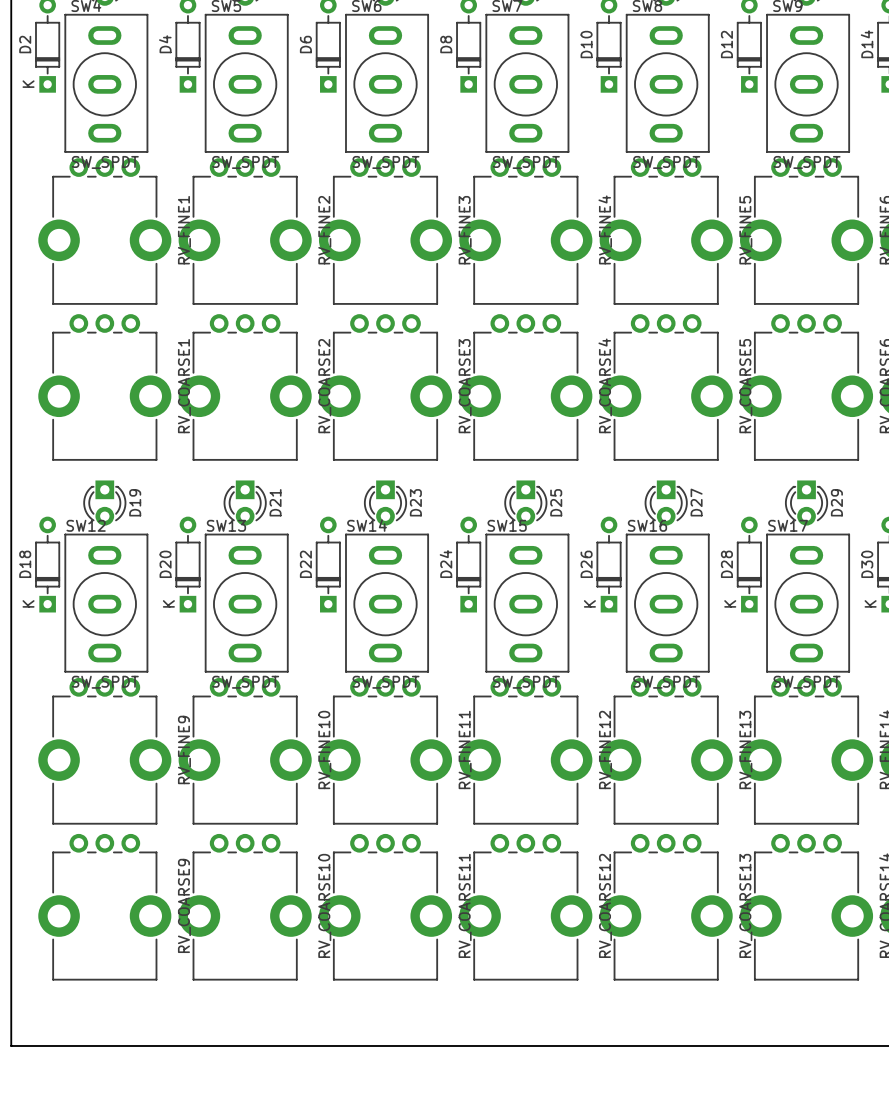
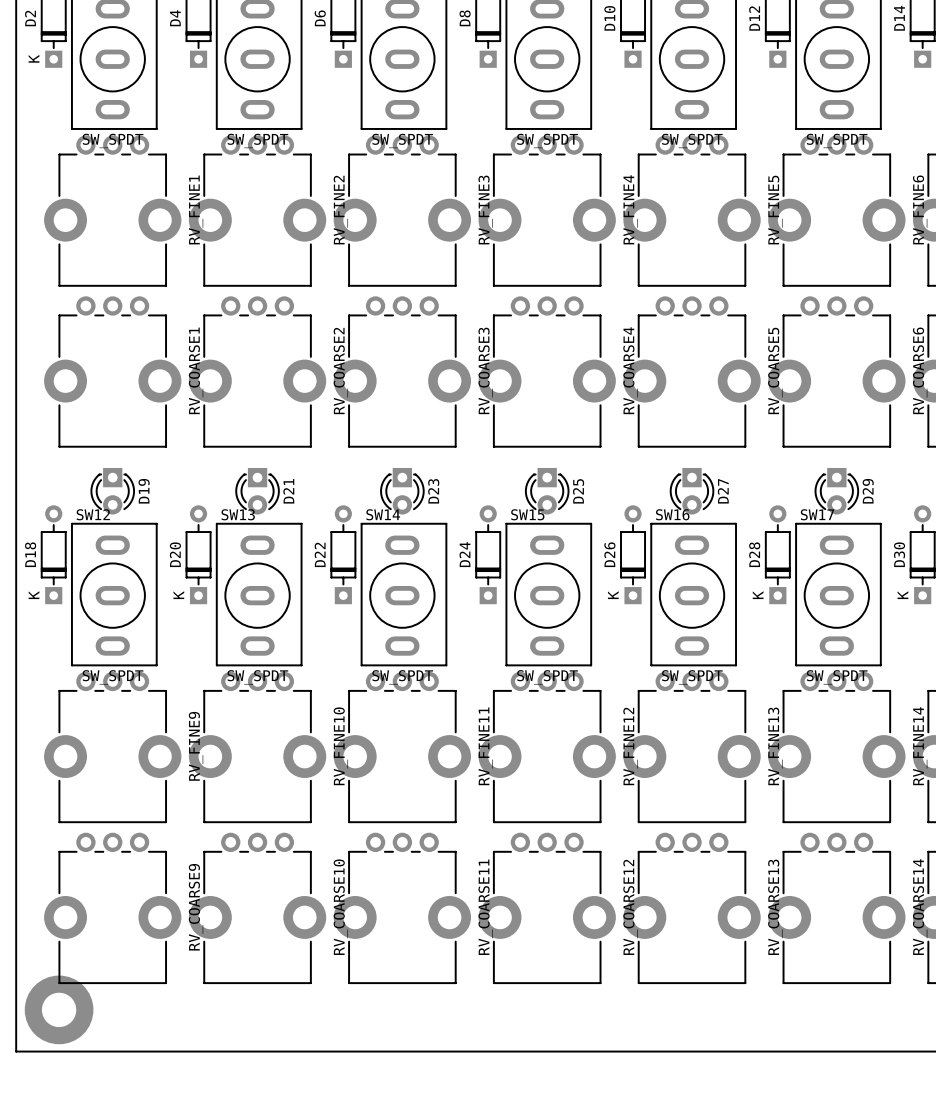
part: none -> (59, 1009)

